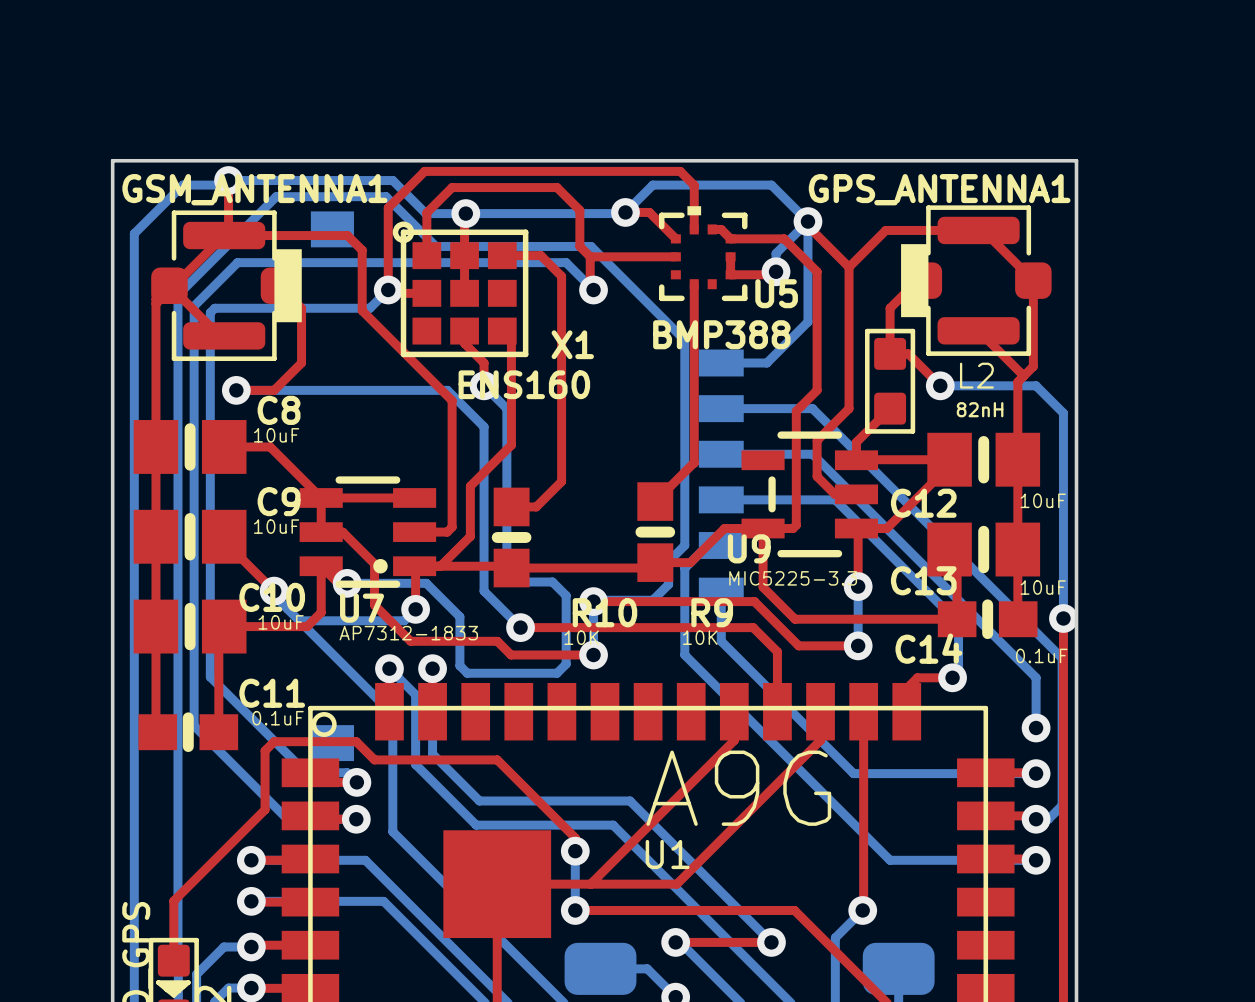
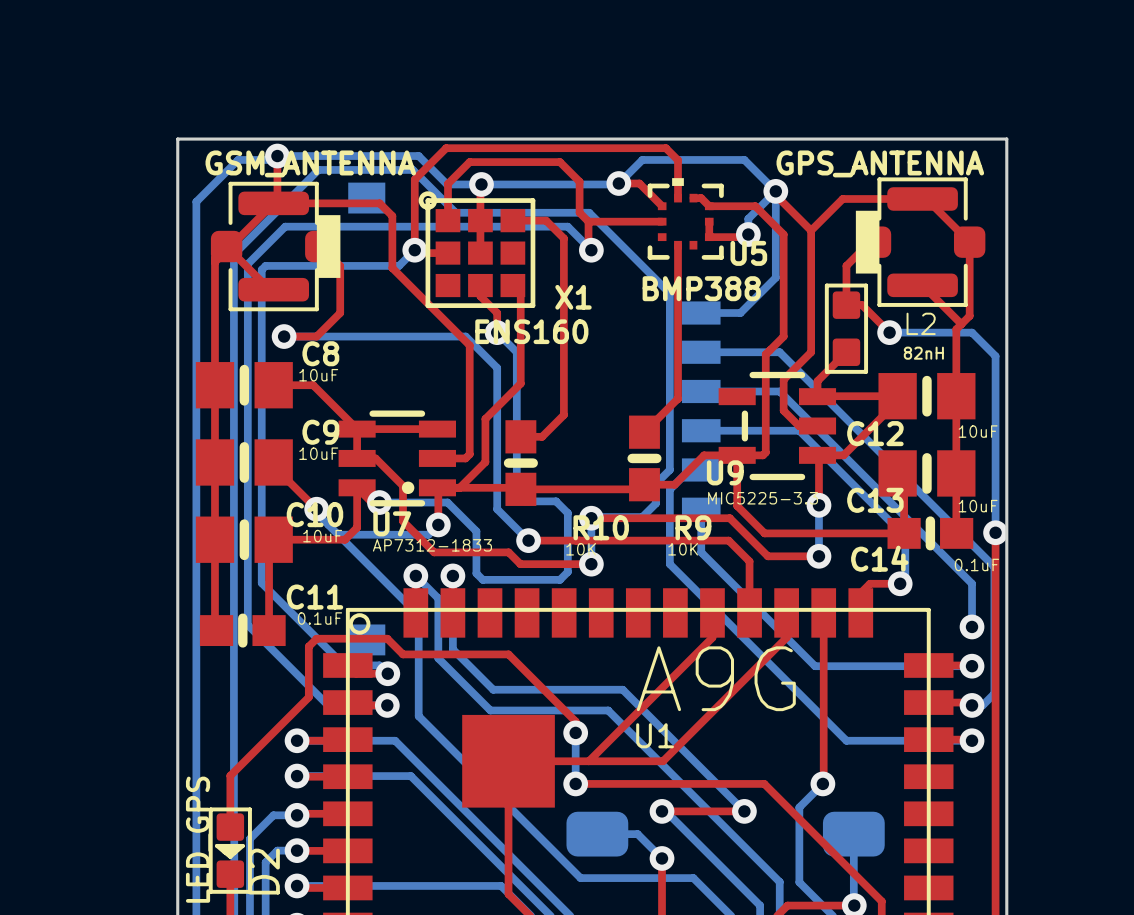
GSM_ANTENNA1 name: GSM_ANTENNA1 (254, 189) -> GSM_ANTENNA (310, 163)
GPS_ANTENNA1 name: GPS_ANTENNA1 (939, 189) -> GPS_ANTENNA (880, 163)

